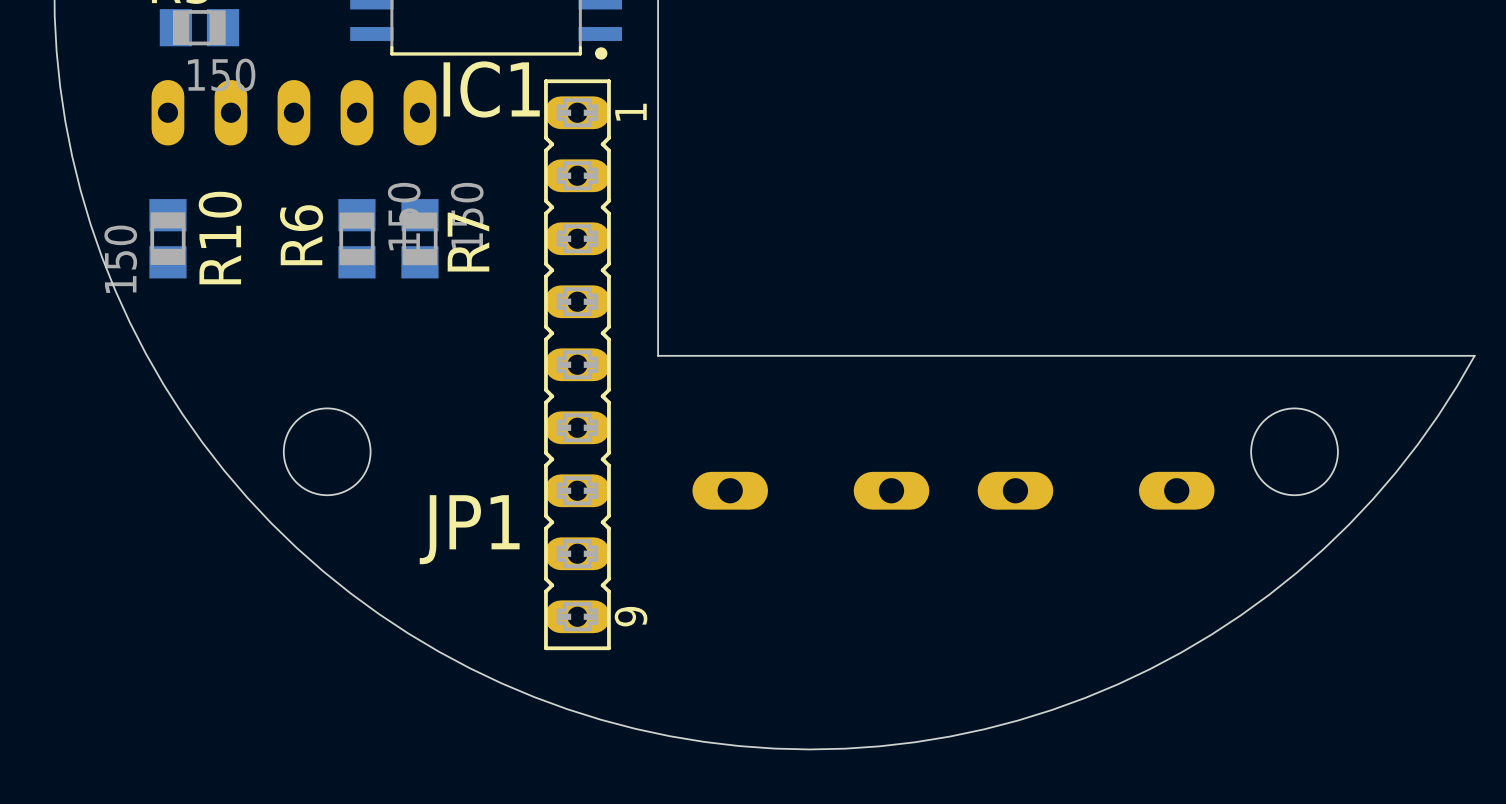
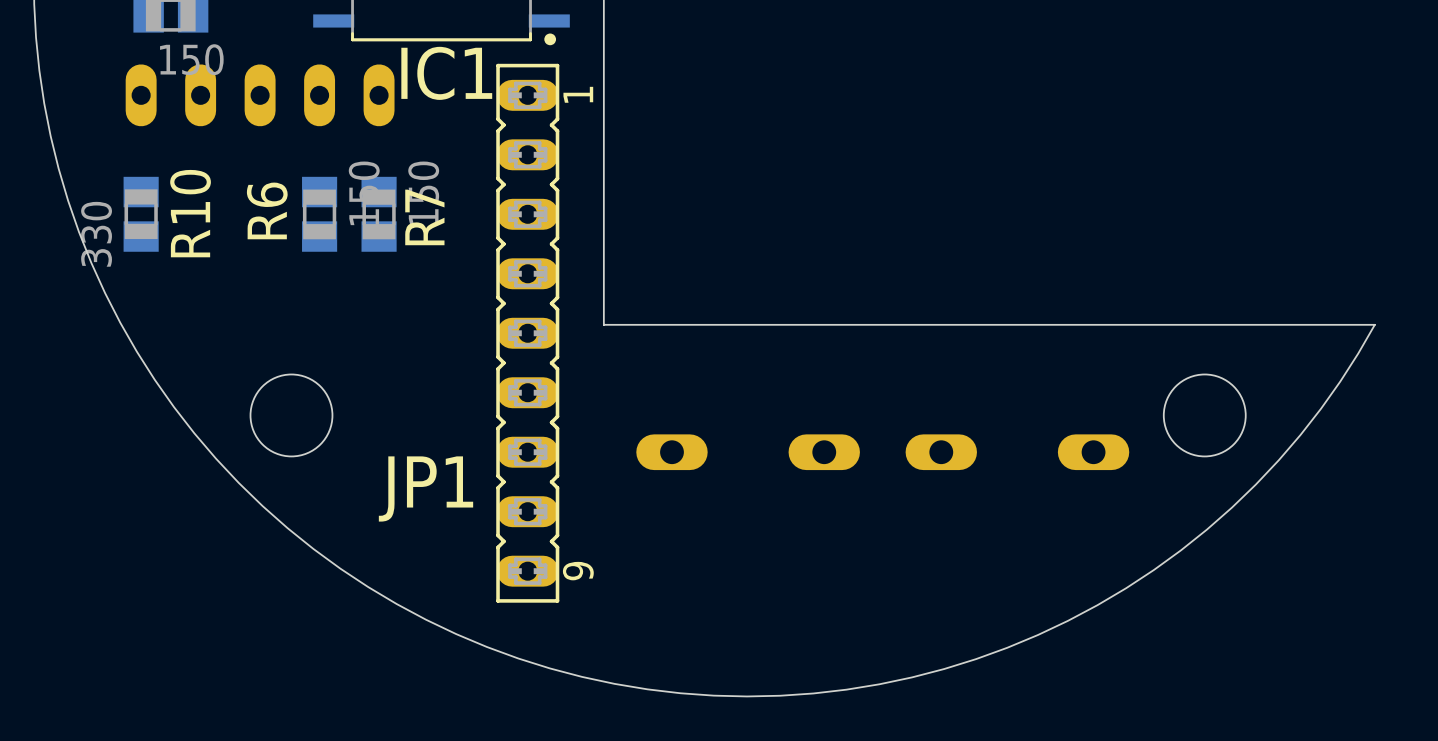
R10 value: 150 (120, 259) -> 330 (96, 234)

